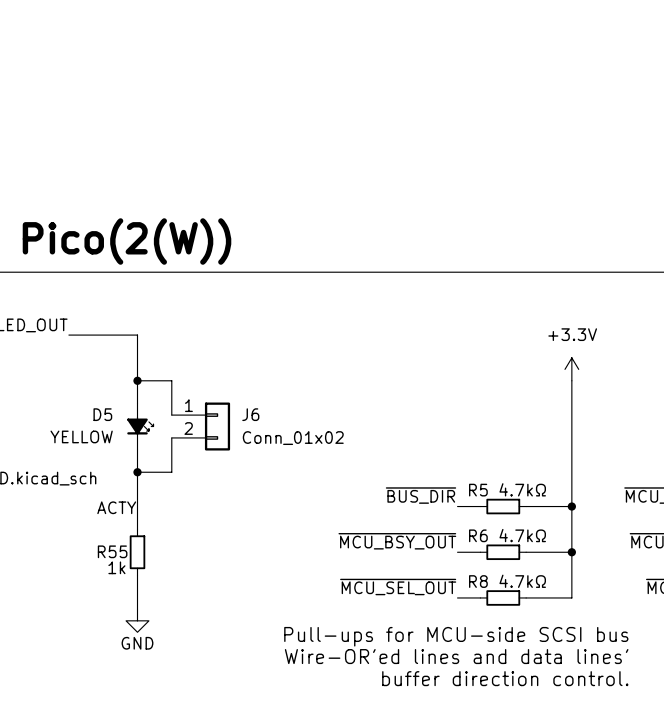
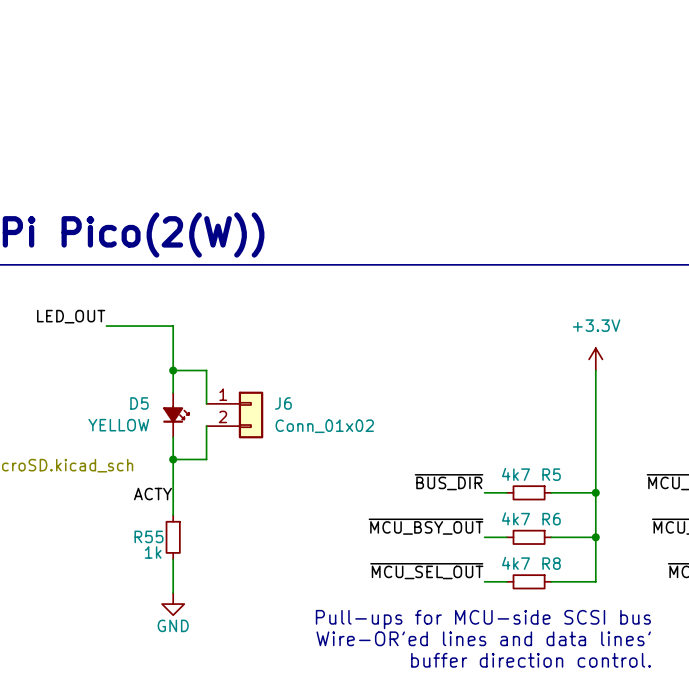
R5 value: 4.7kΩ (522, 489) -> 4k7 (515, 474)
R5 name position: R5 (478, 490) -> R5 (551, 474)
R6 name position: R6 (478, 535) -> R6 (551, 519)
R6 value: 4.7kΩ (522, 535) -> 4k7 (515, 518)
R8 name position: R8 (478, 581) -> R8 (551, 563)
R8 value: 4.7kΩ (522, 581) -> 4k7 (515, 563)

